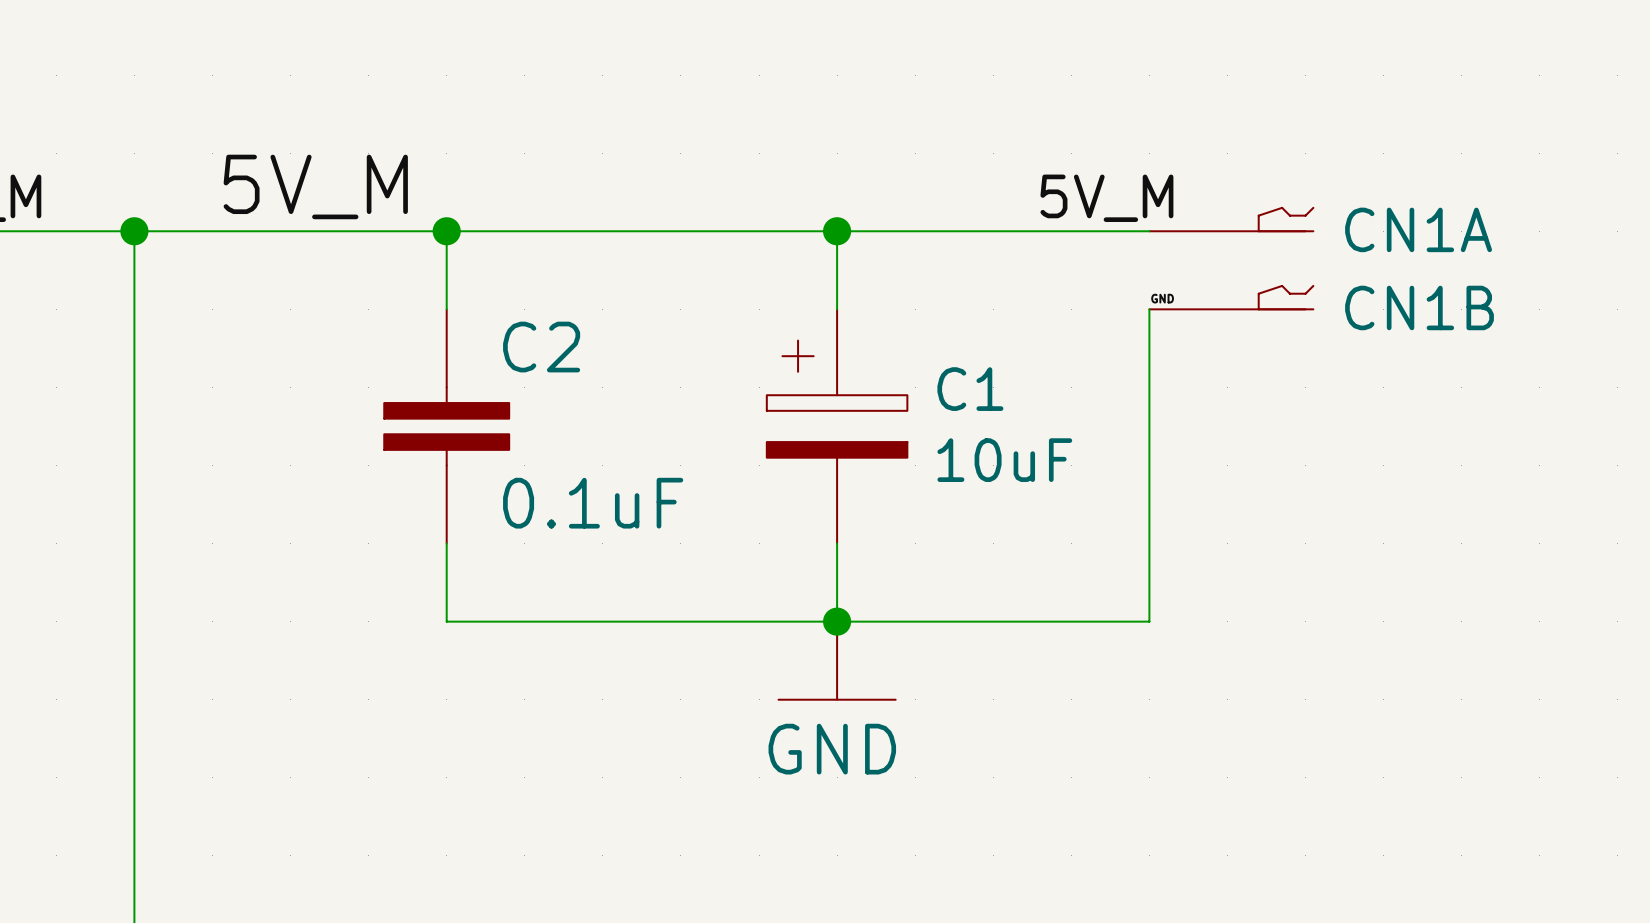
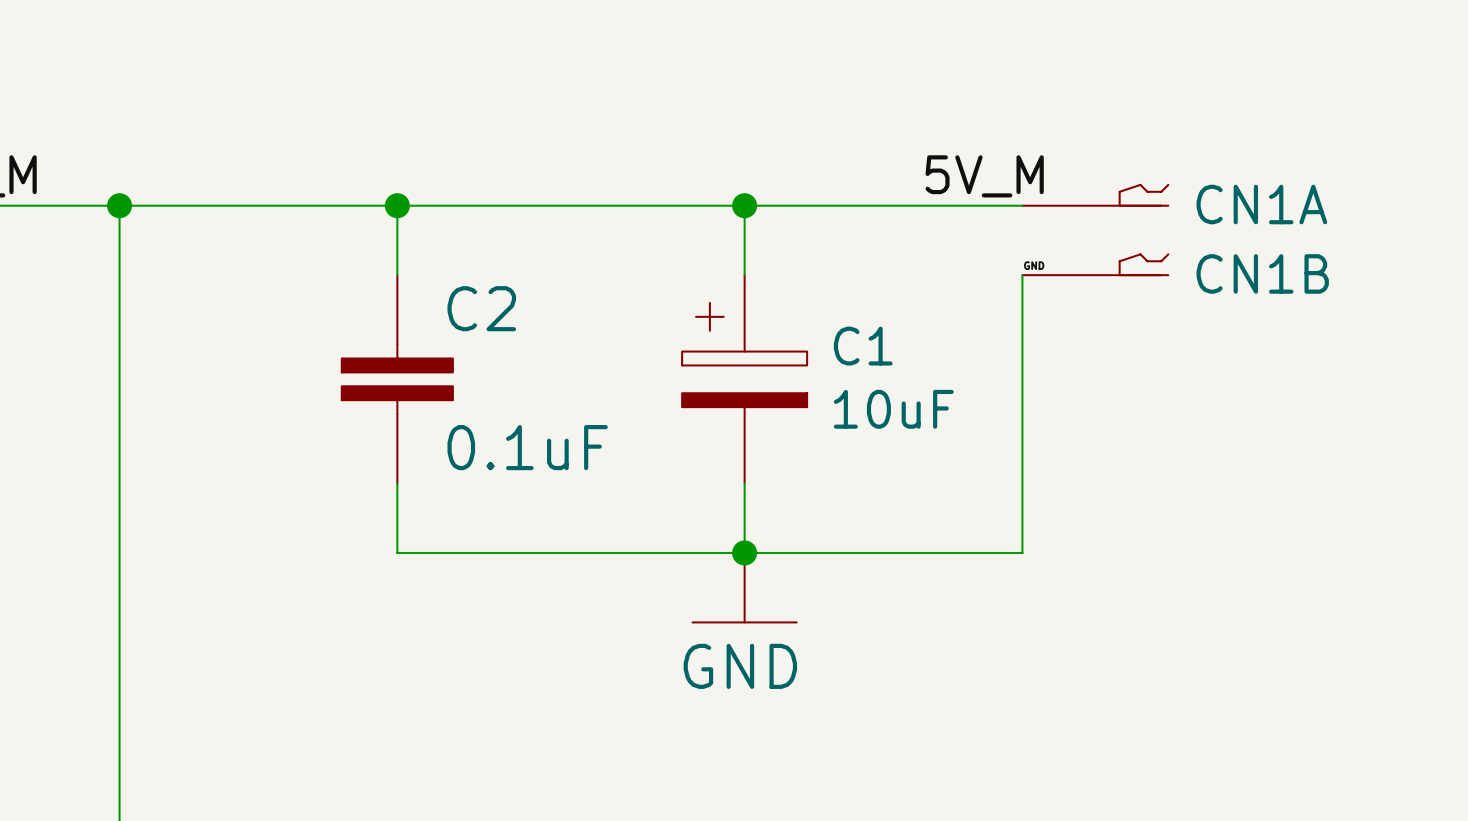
label: 5V_M (315, 186) -> none

